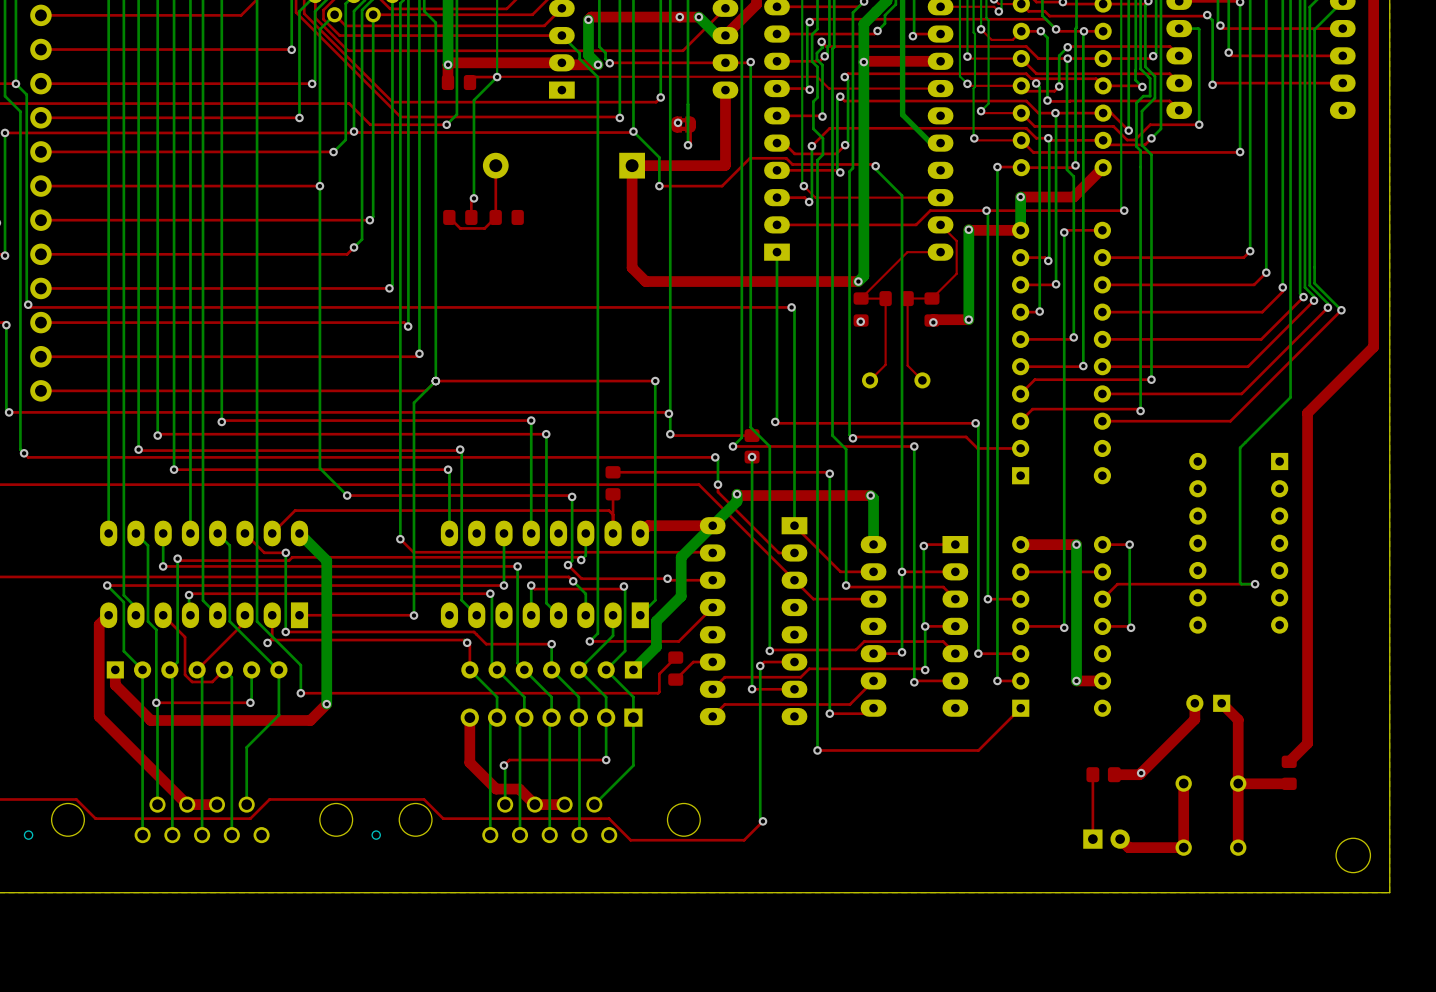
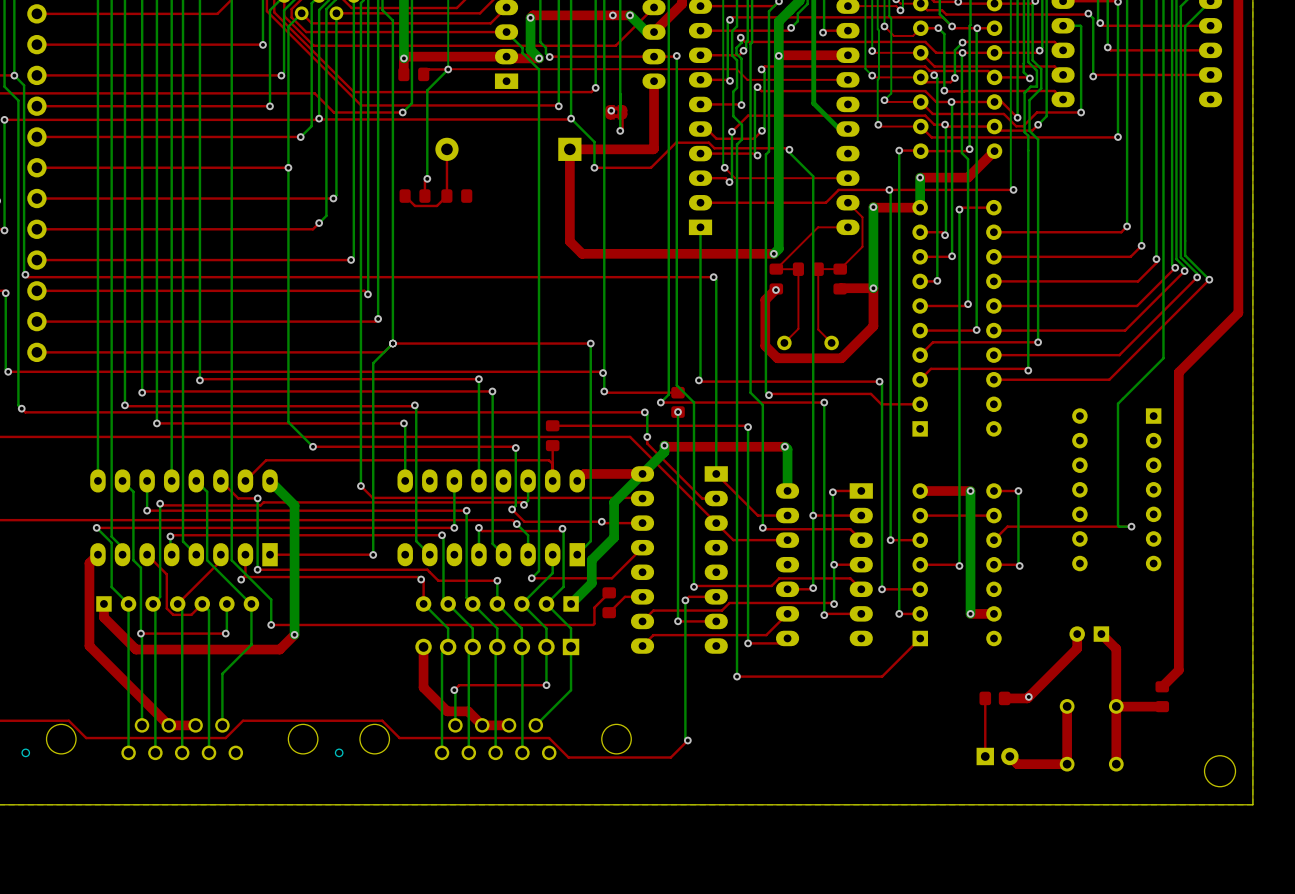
top track: none -> (873, 288) (873, 326) (841, 358) (777, 358) (765, 345) (765, 299) (776, 288)
via: (933, 322) -> none

